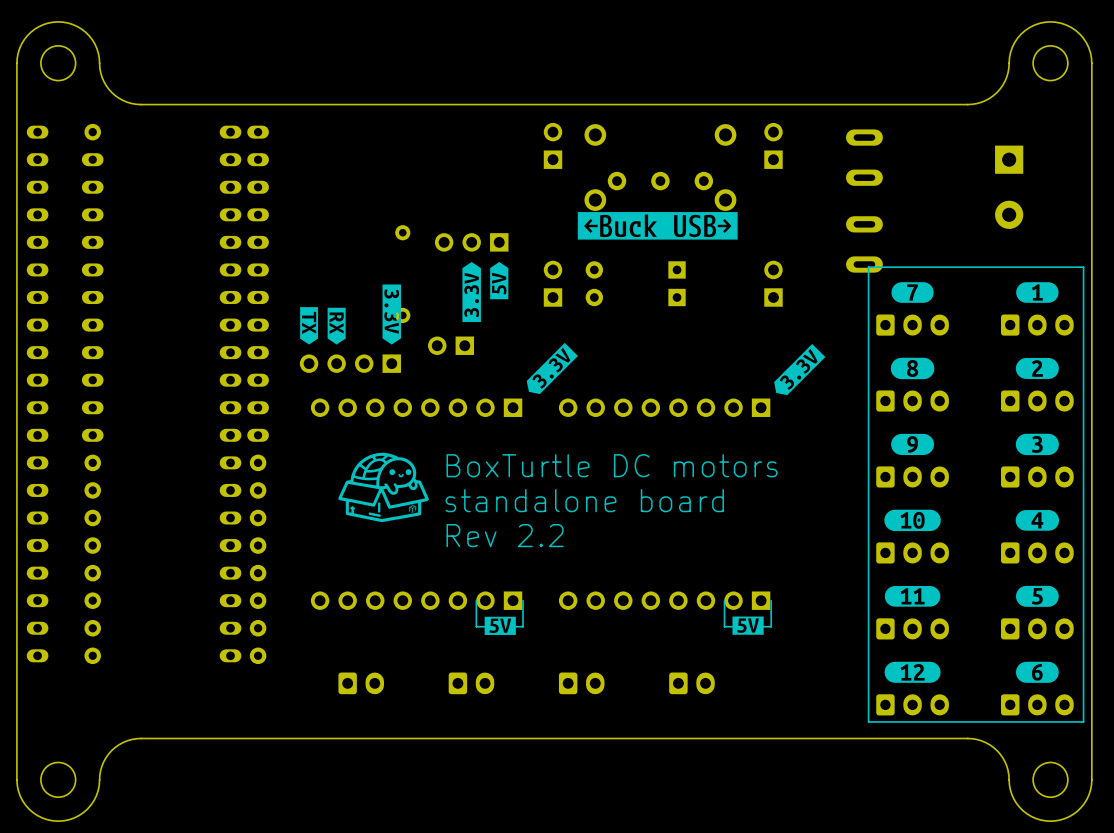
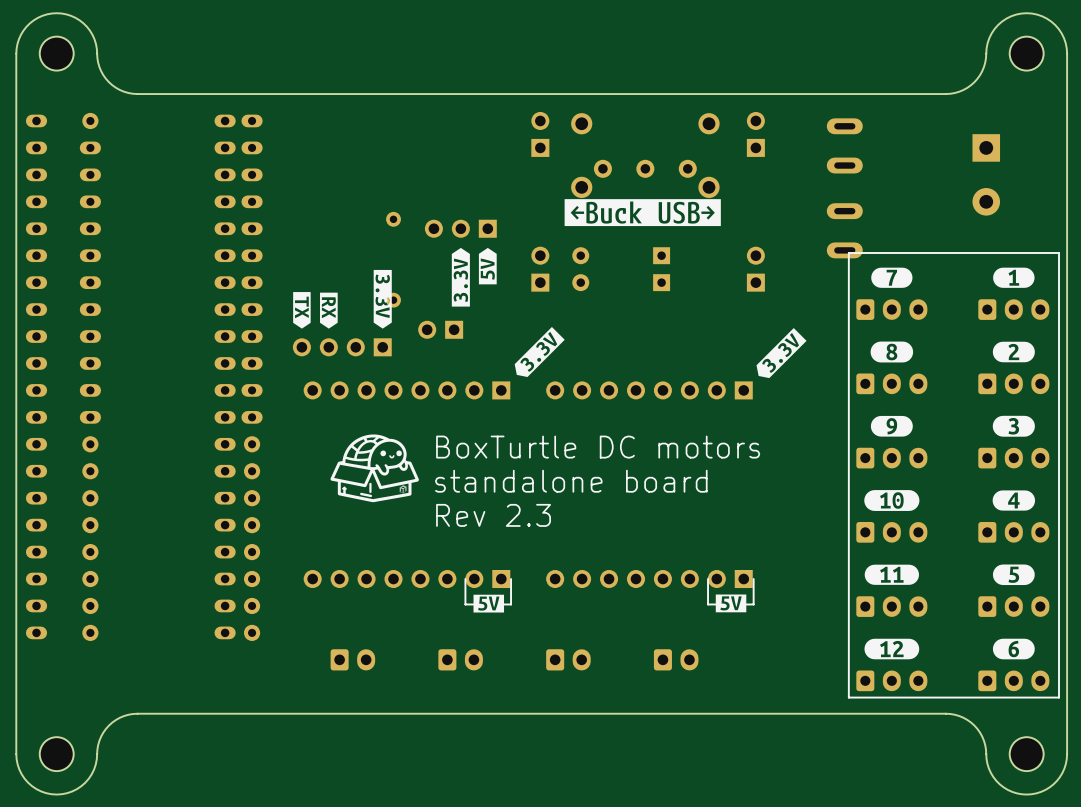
text: Rev 2.2 (505, 535) -> Rev 2.3 (493, 515)

